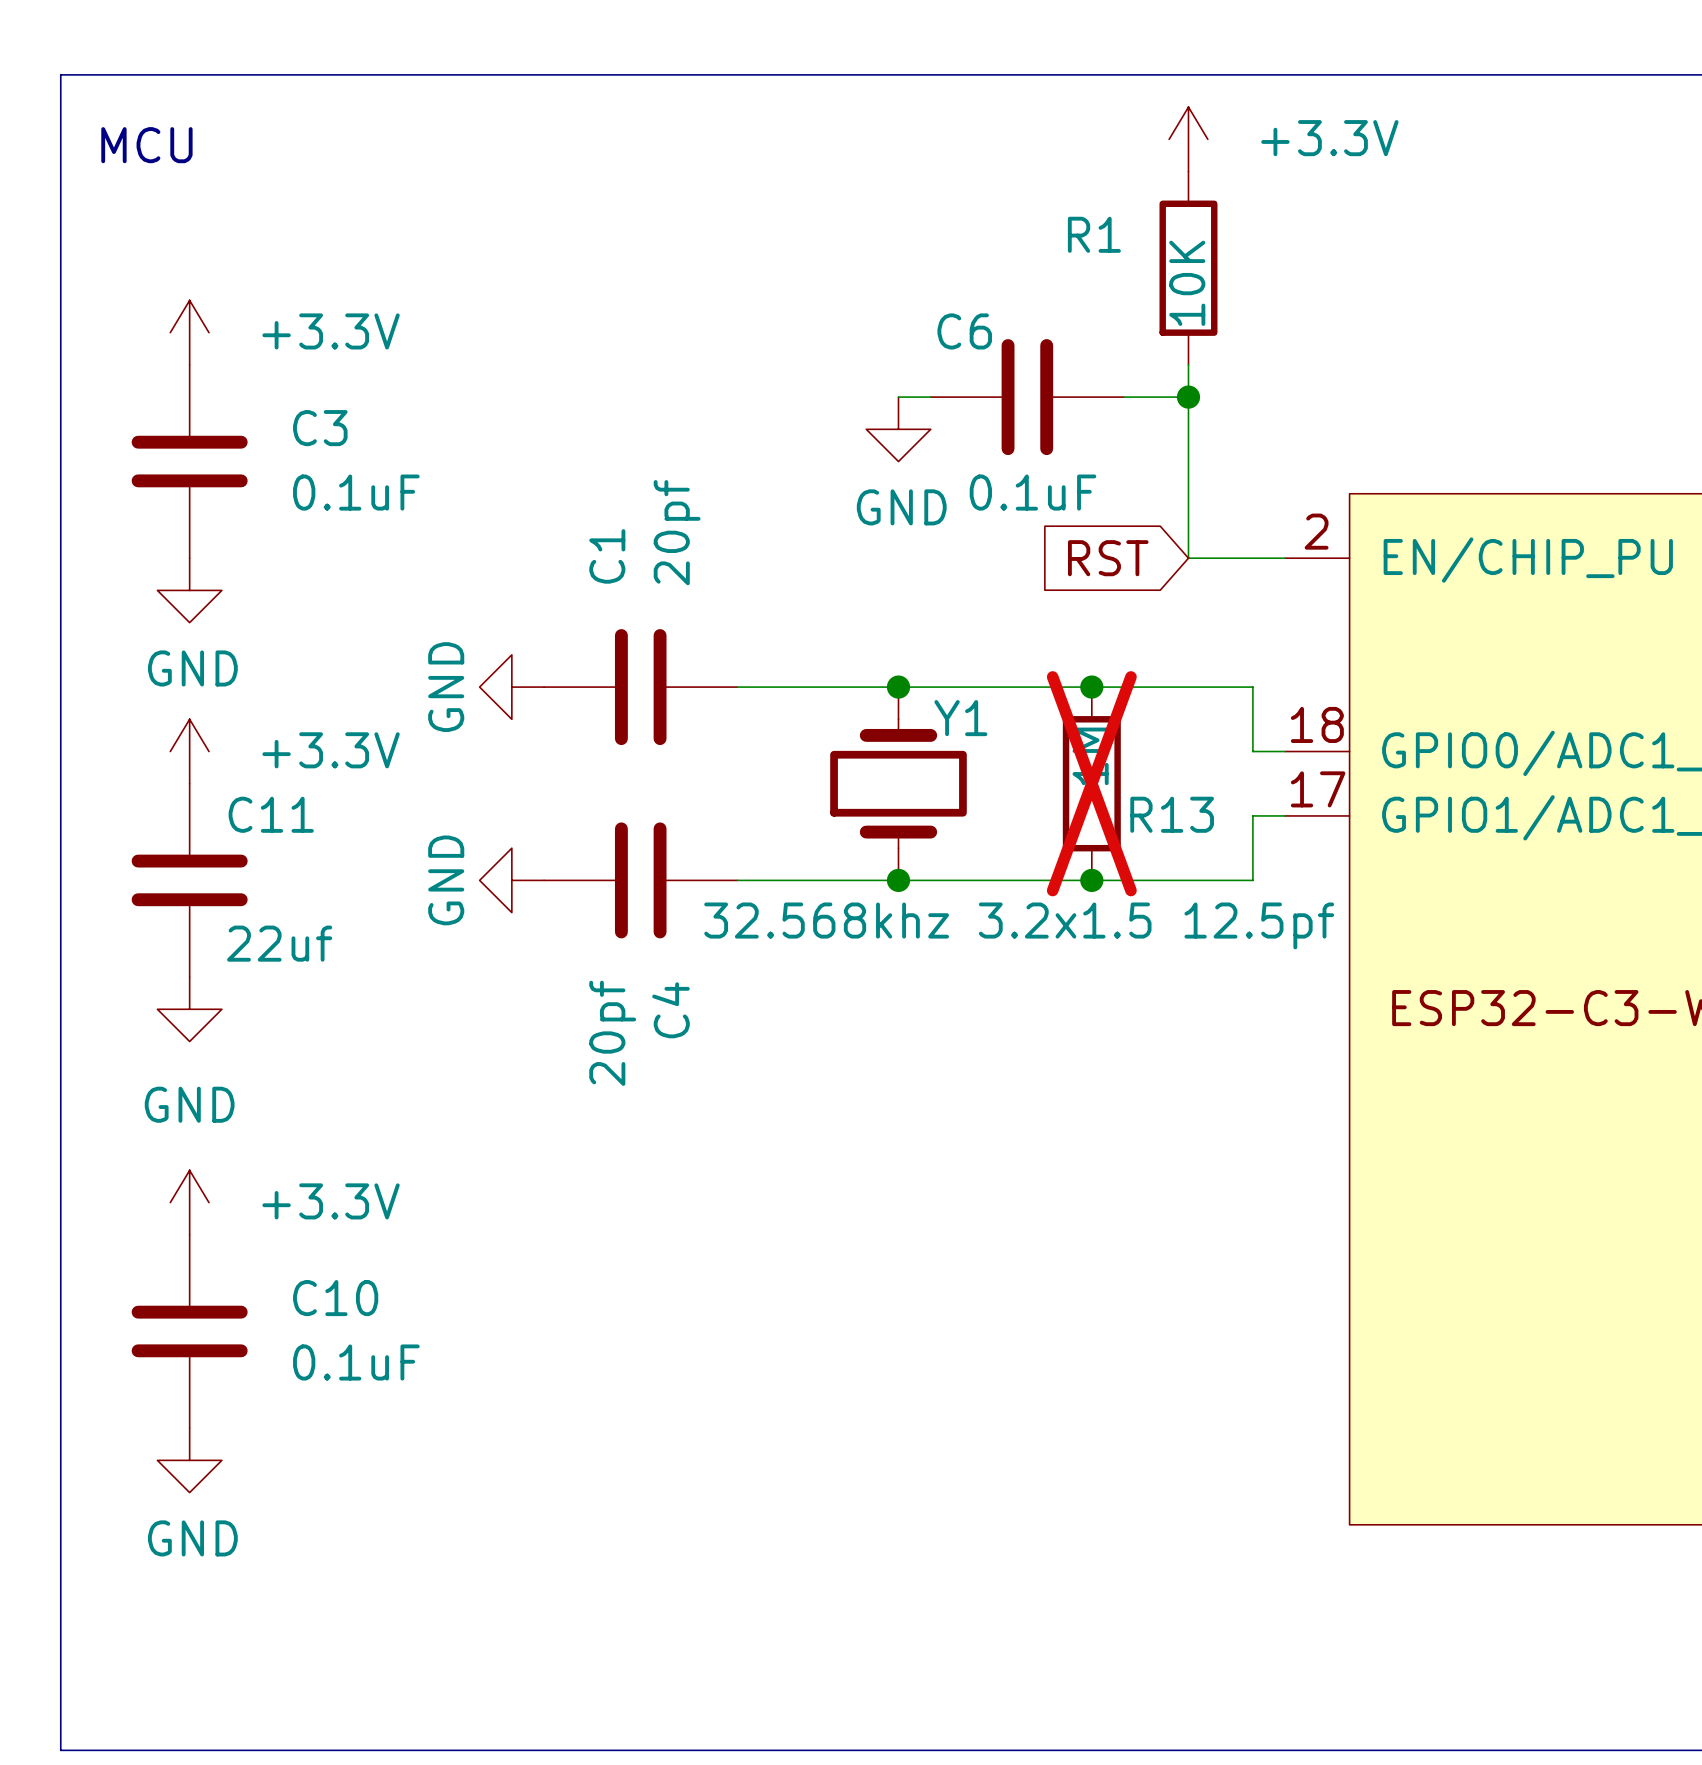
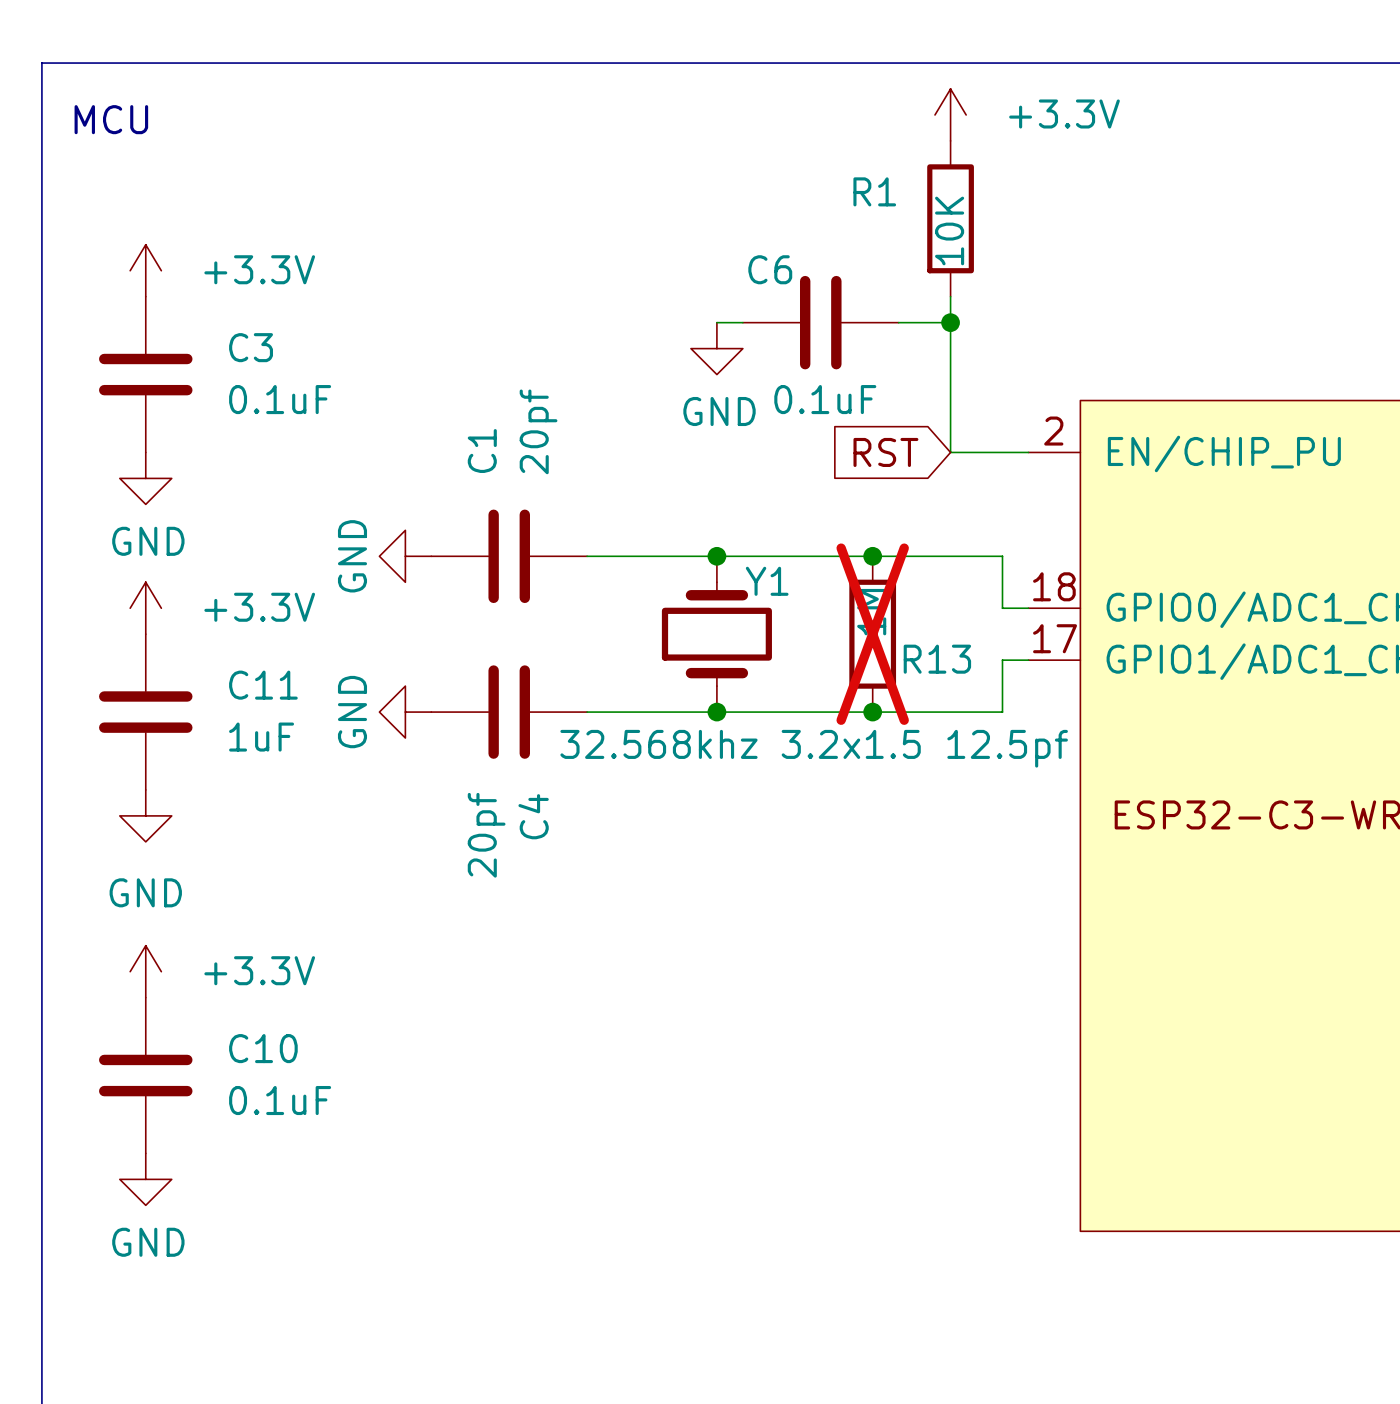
C11 name position: C11 (271, 814) -> C11 (263, 685)
C11 value: 22uf (279, 943) -> 1uF (261, 737)

